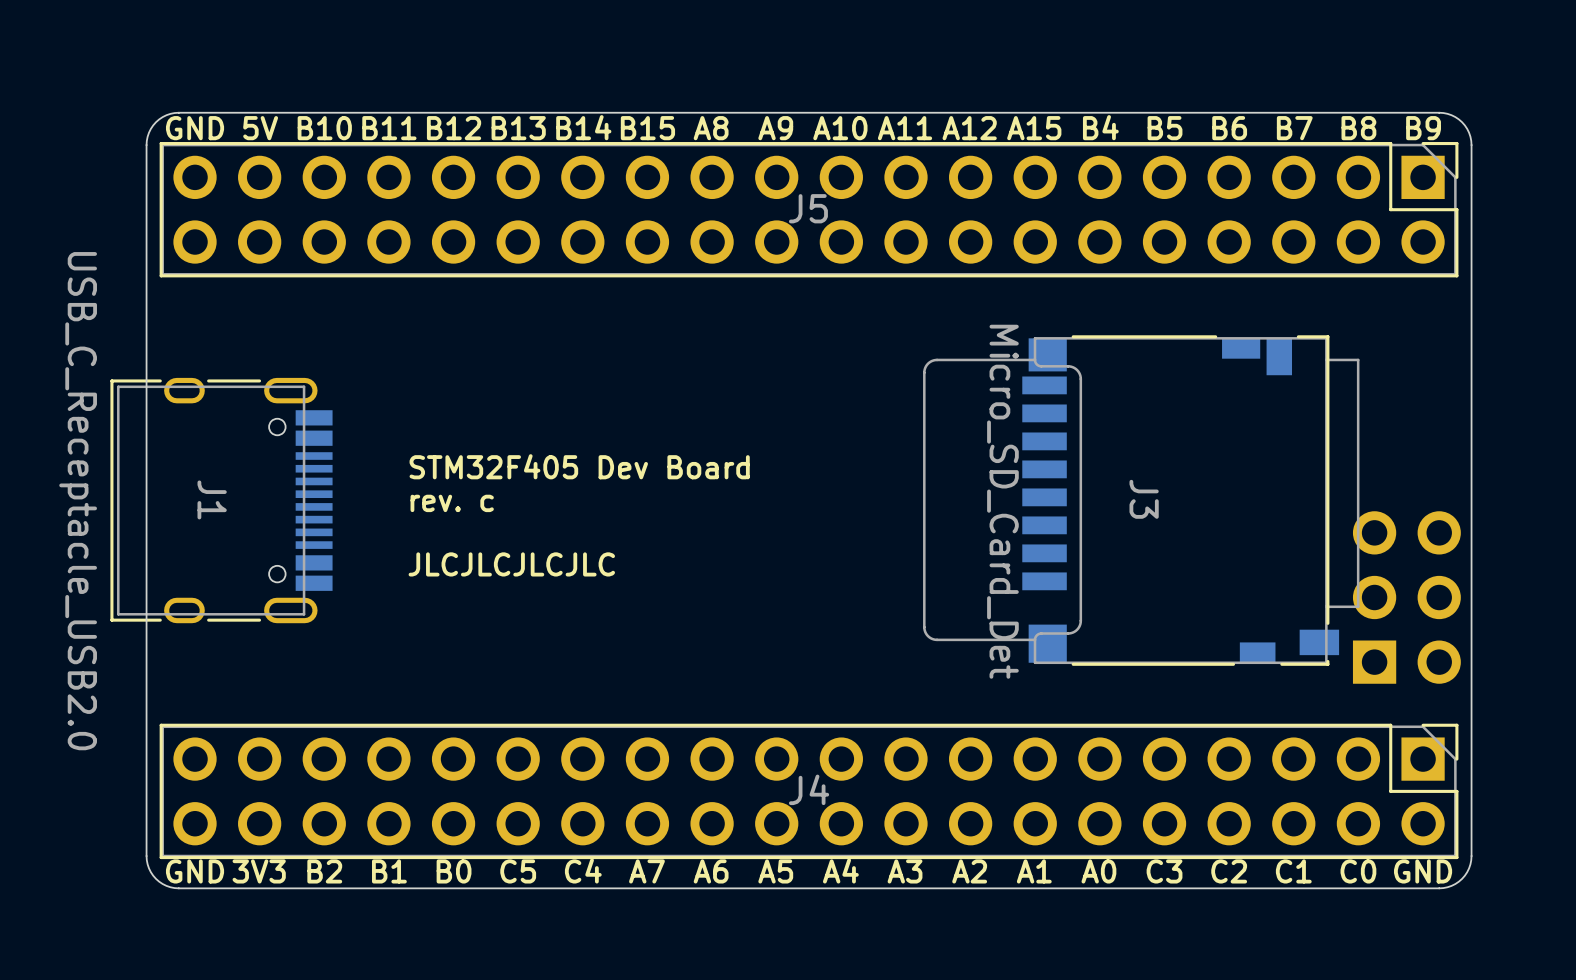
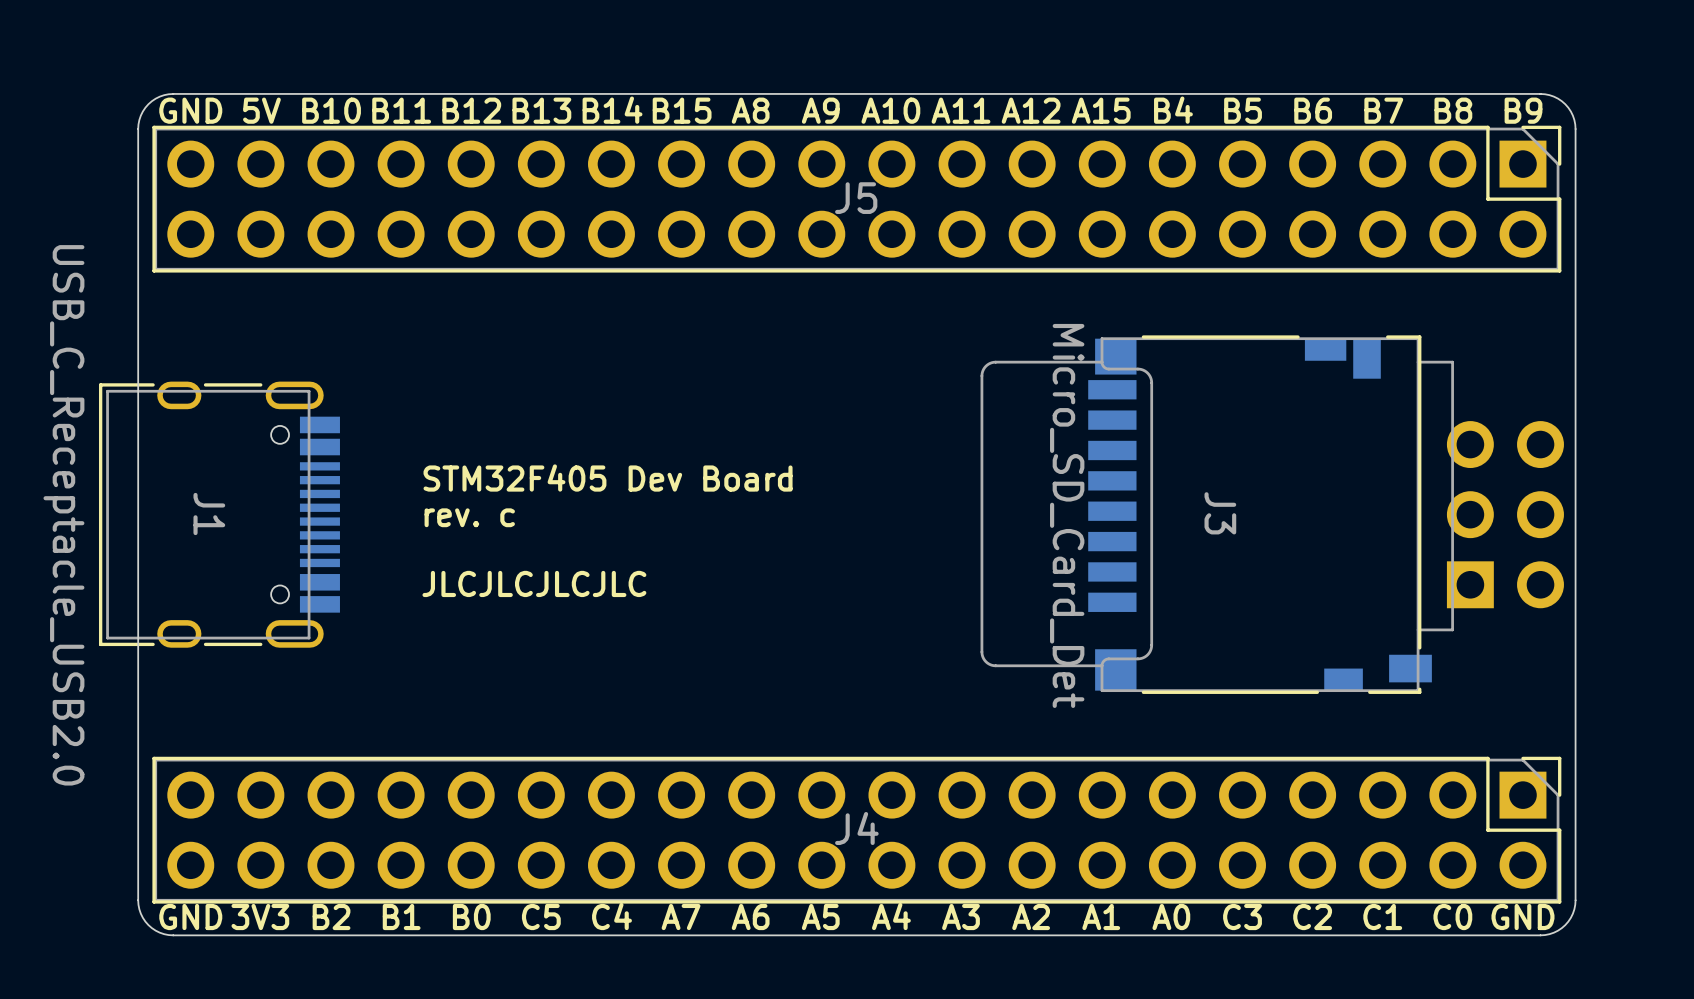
part position: (1406, 597) -> (1505, 514)

